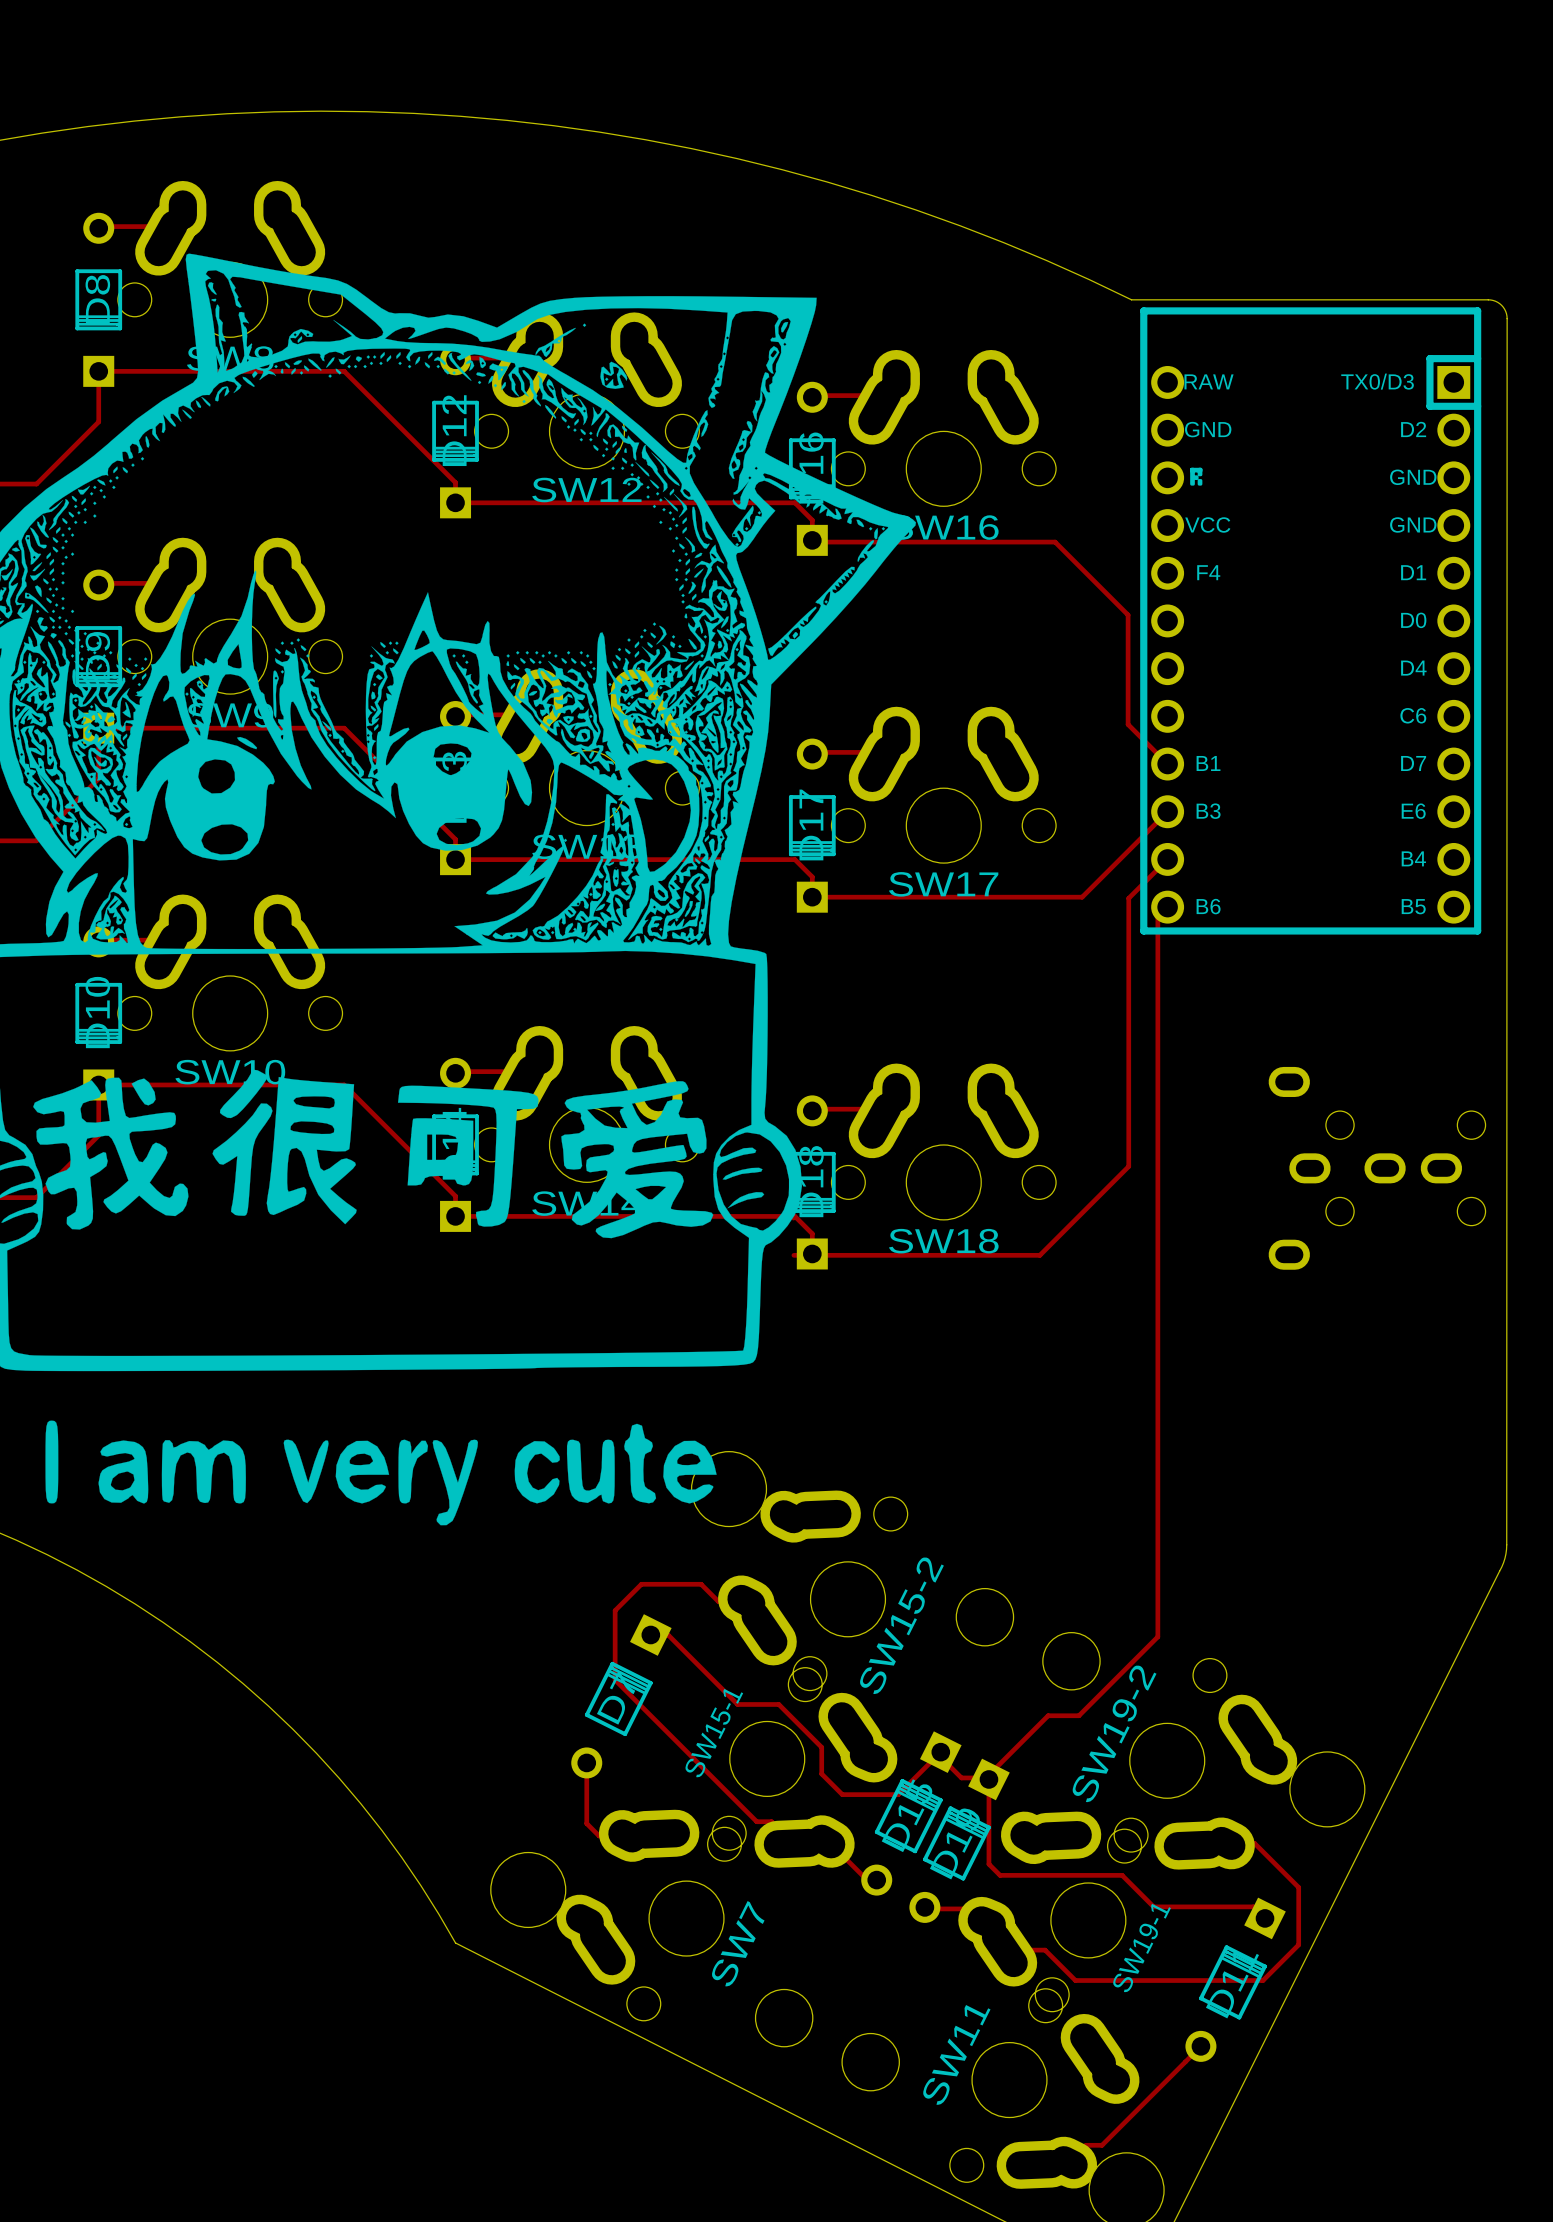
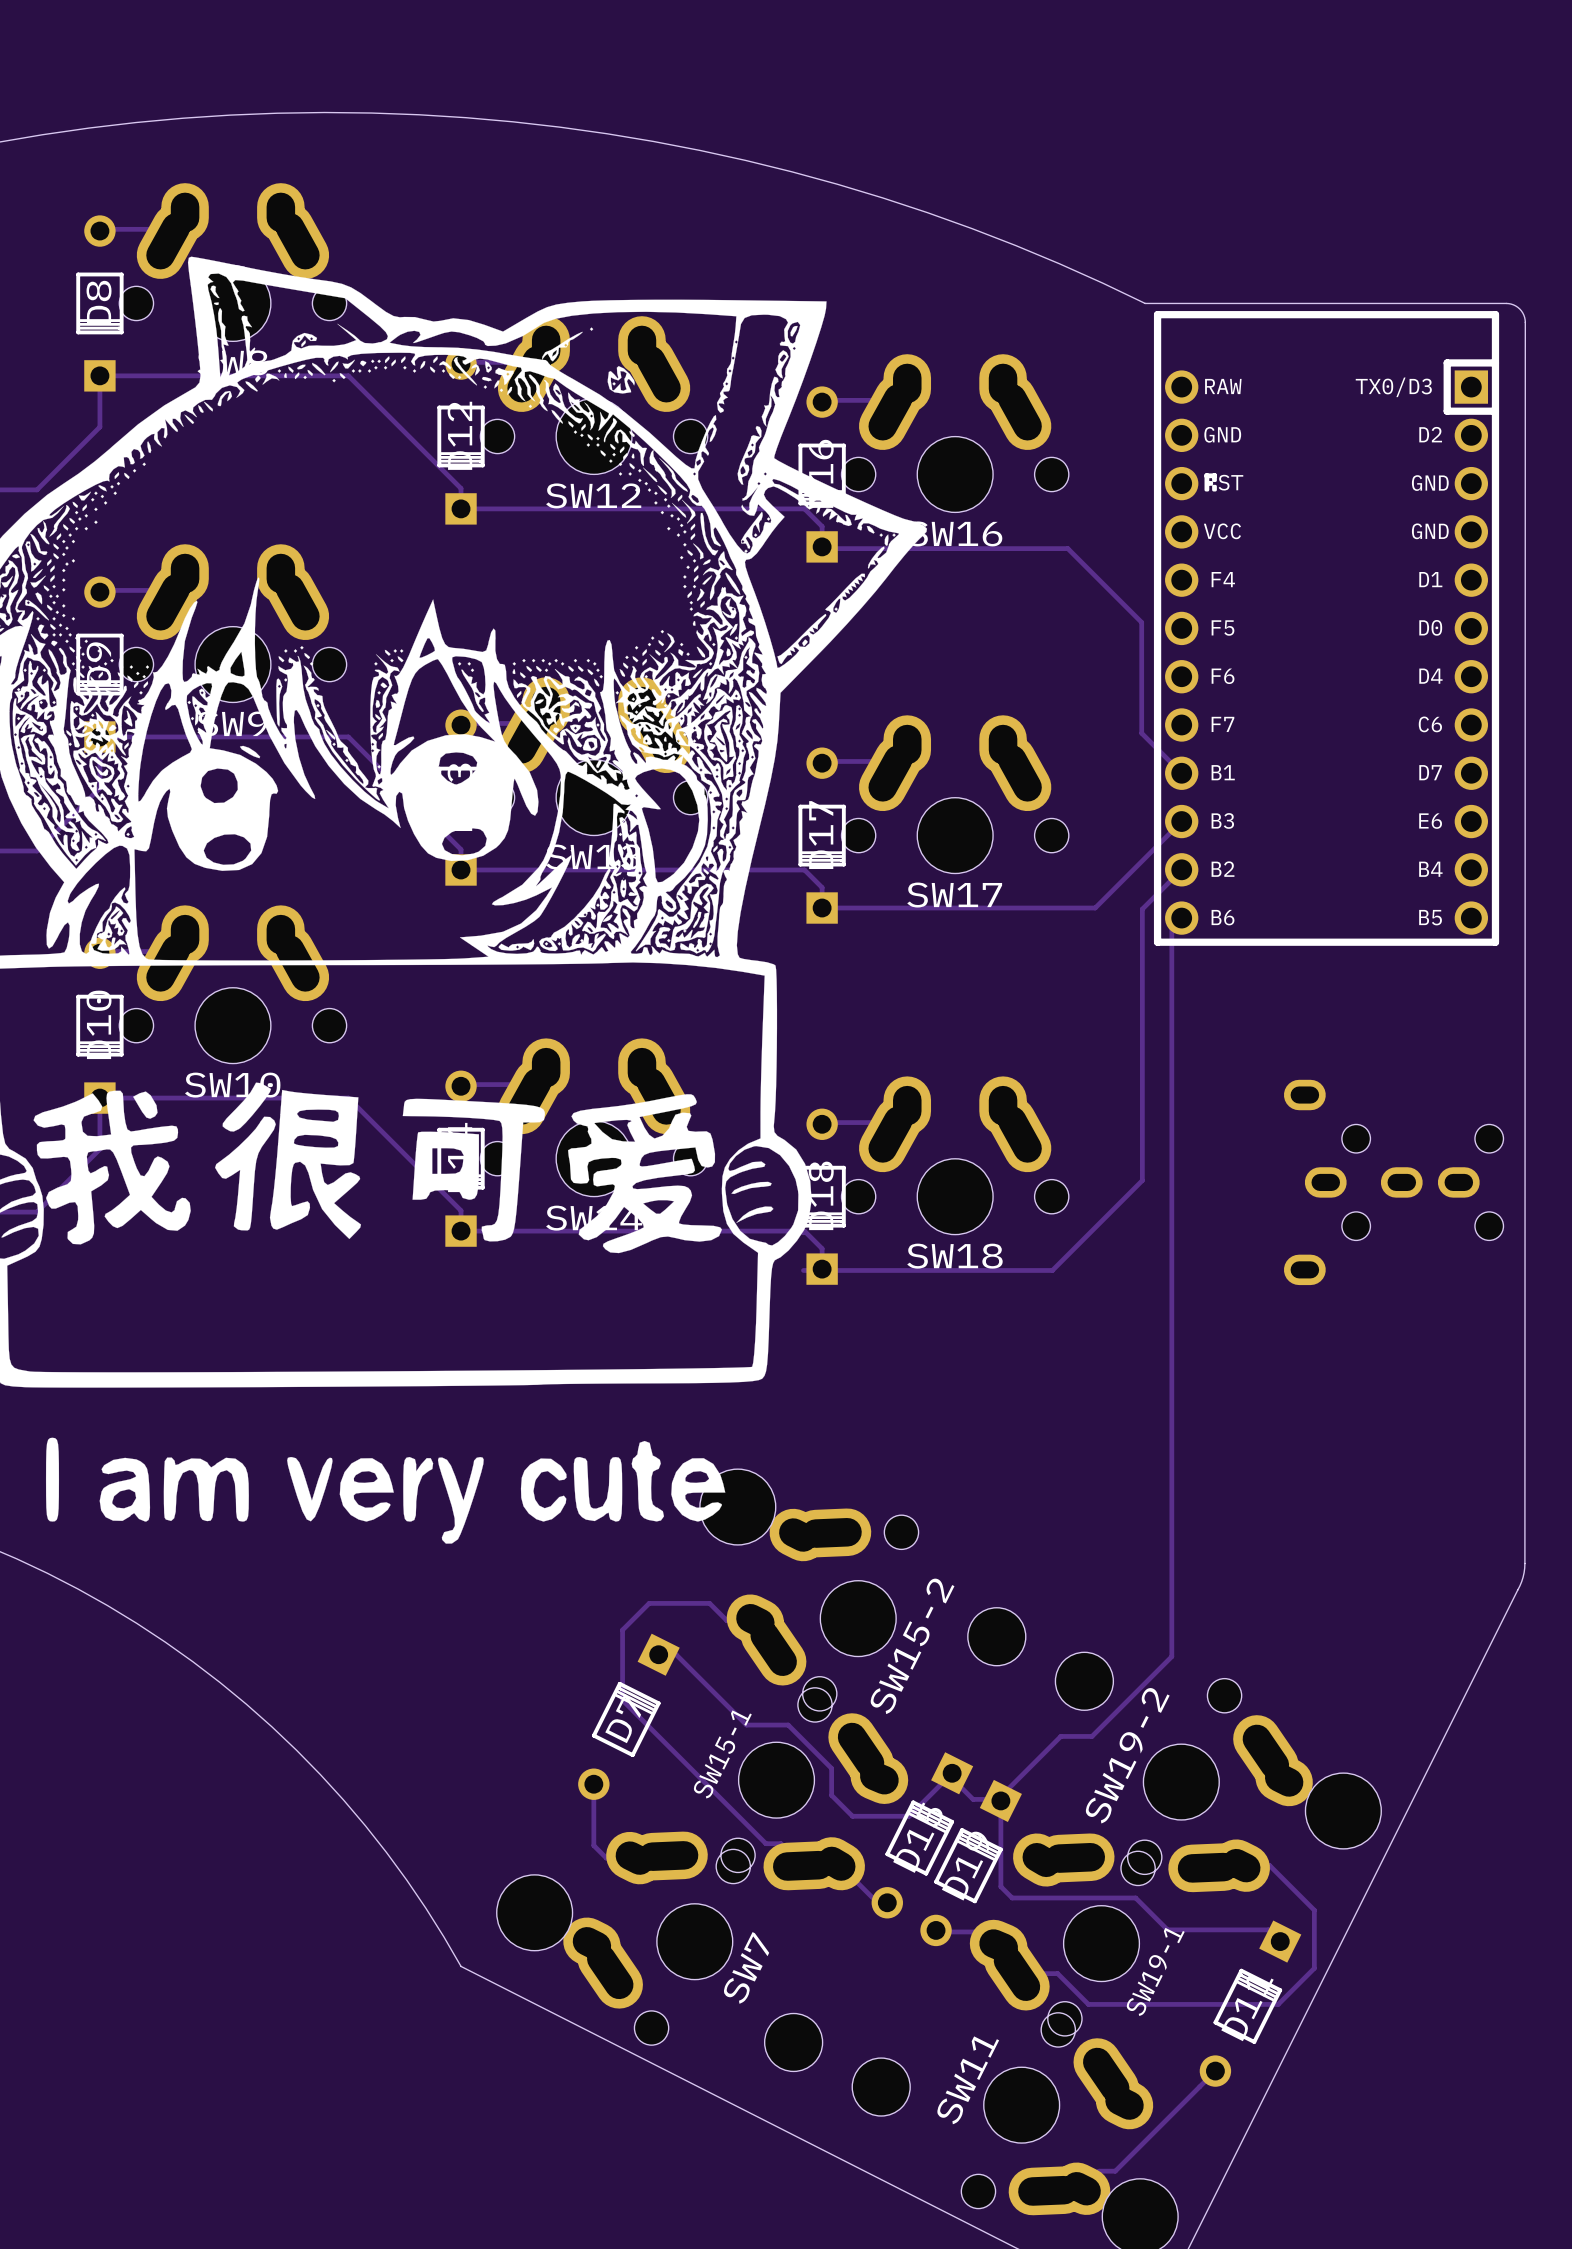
part text: none -> ST (1230, 482)
part text: none -> F5 (1222, 628)
part text: none -> F6 (1223, 676)
part text: none -> F7 (1222, 724)
part text: none -> B2 (1223, 869)

